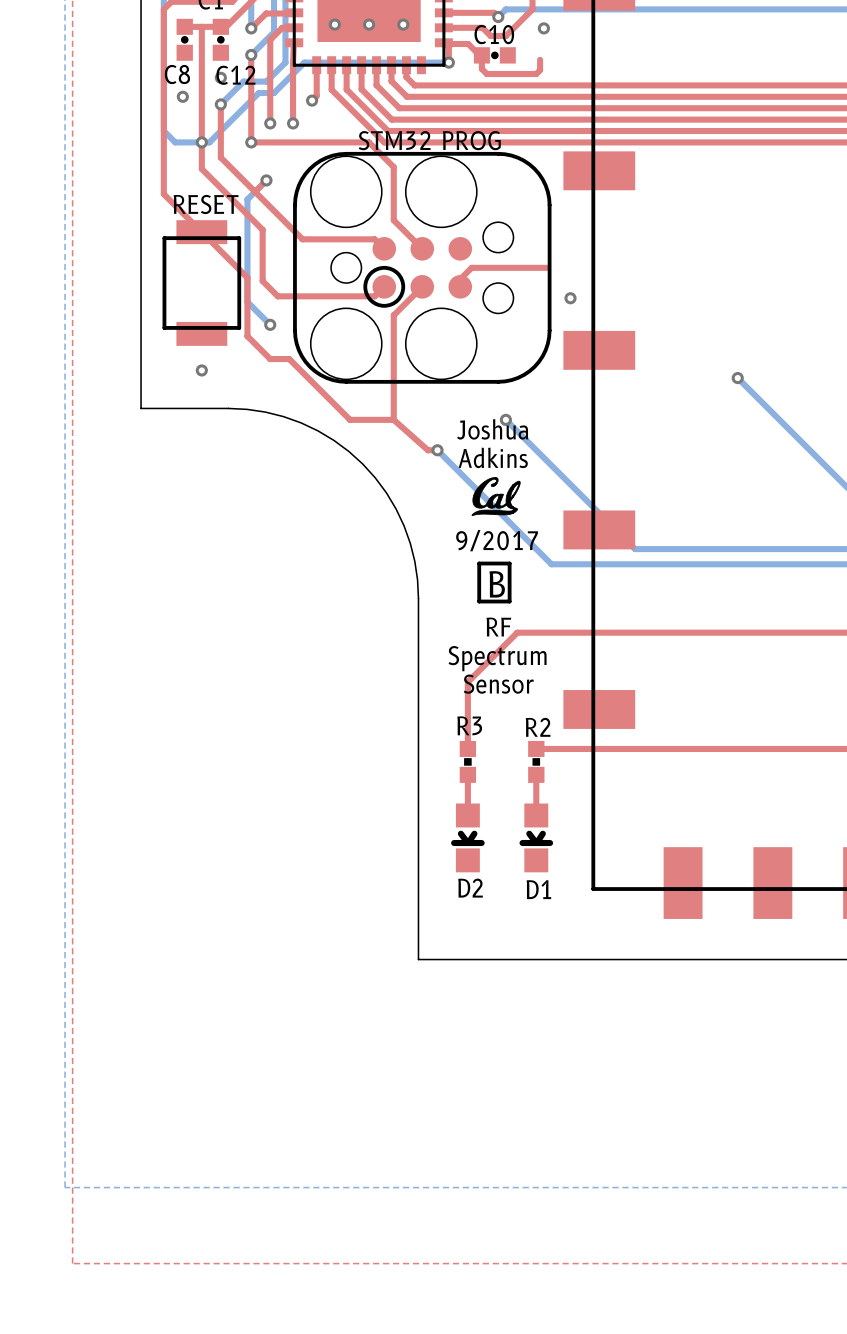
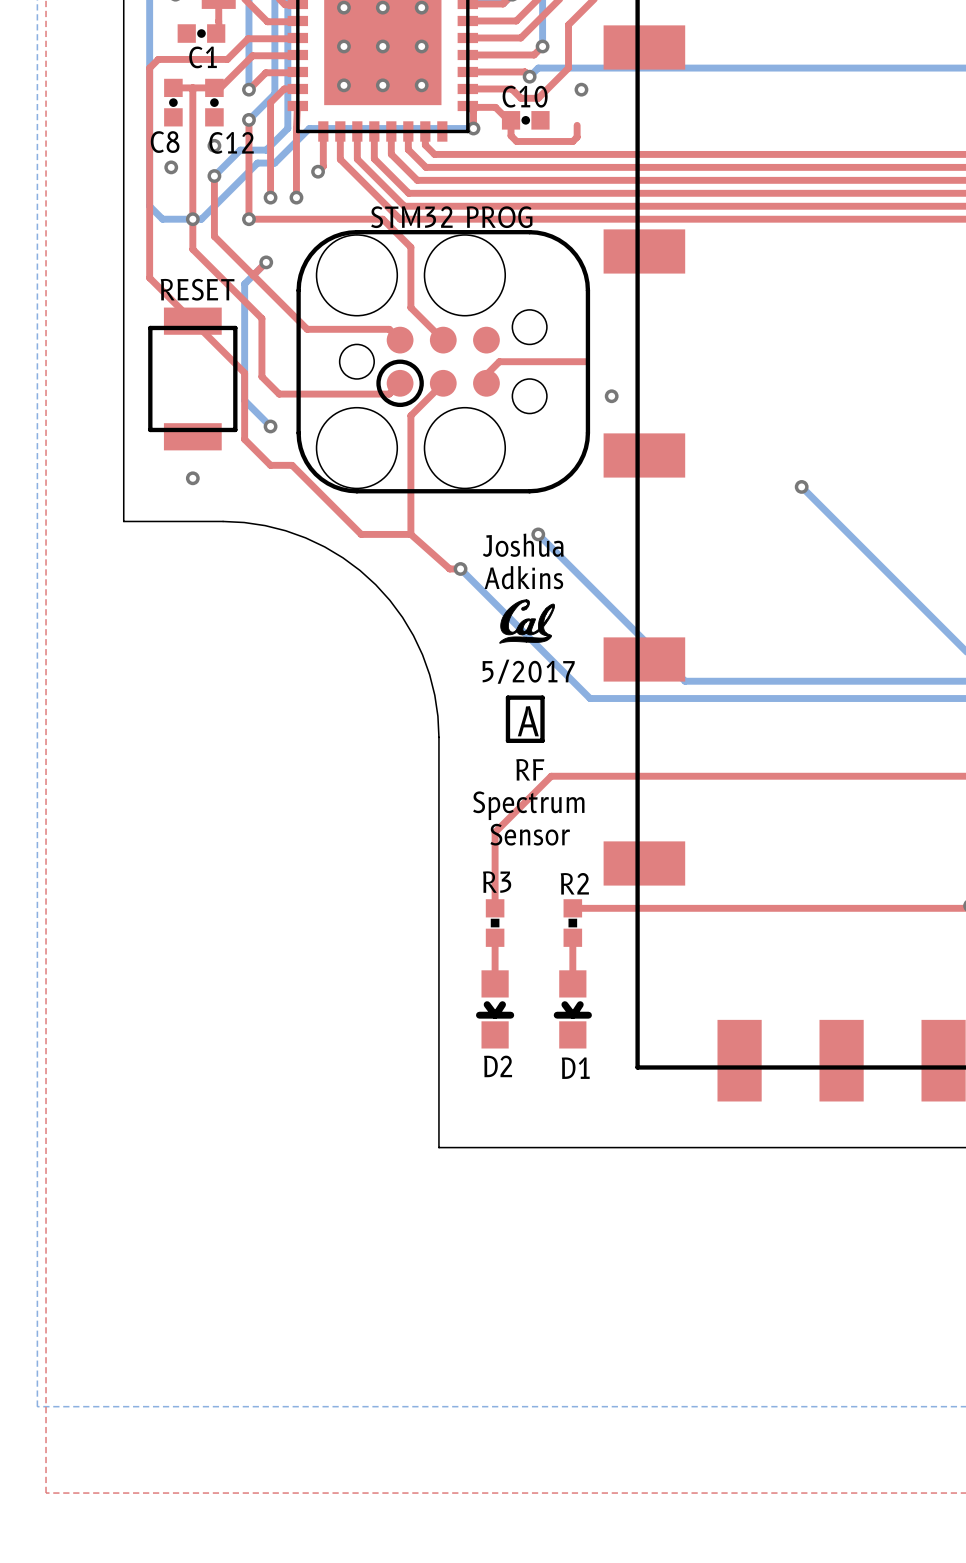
text: 9/2017 (497, 540) -> 5/2017 (528, 671)
text: B (497, 584) -> A (528, 721)

